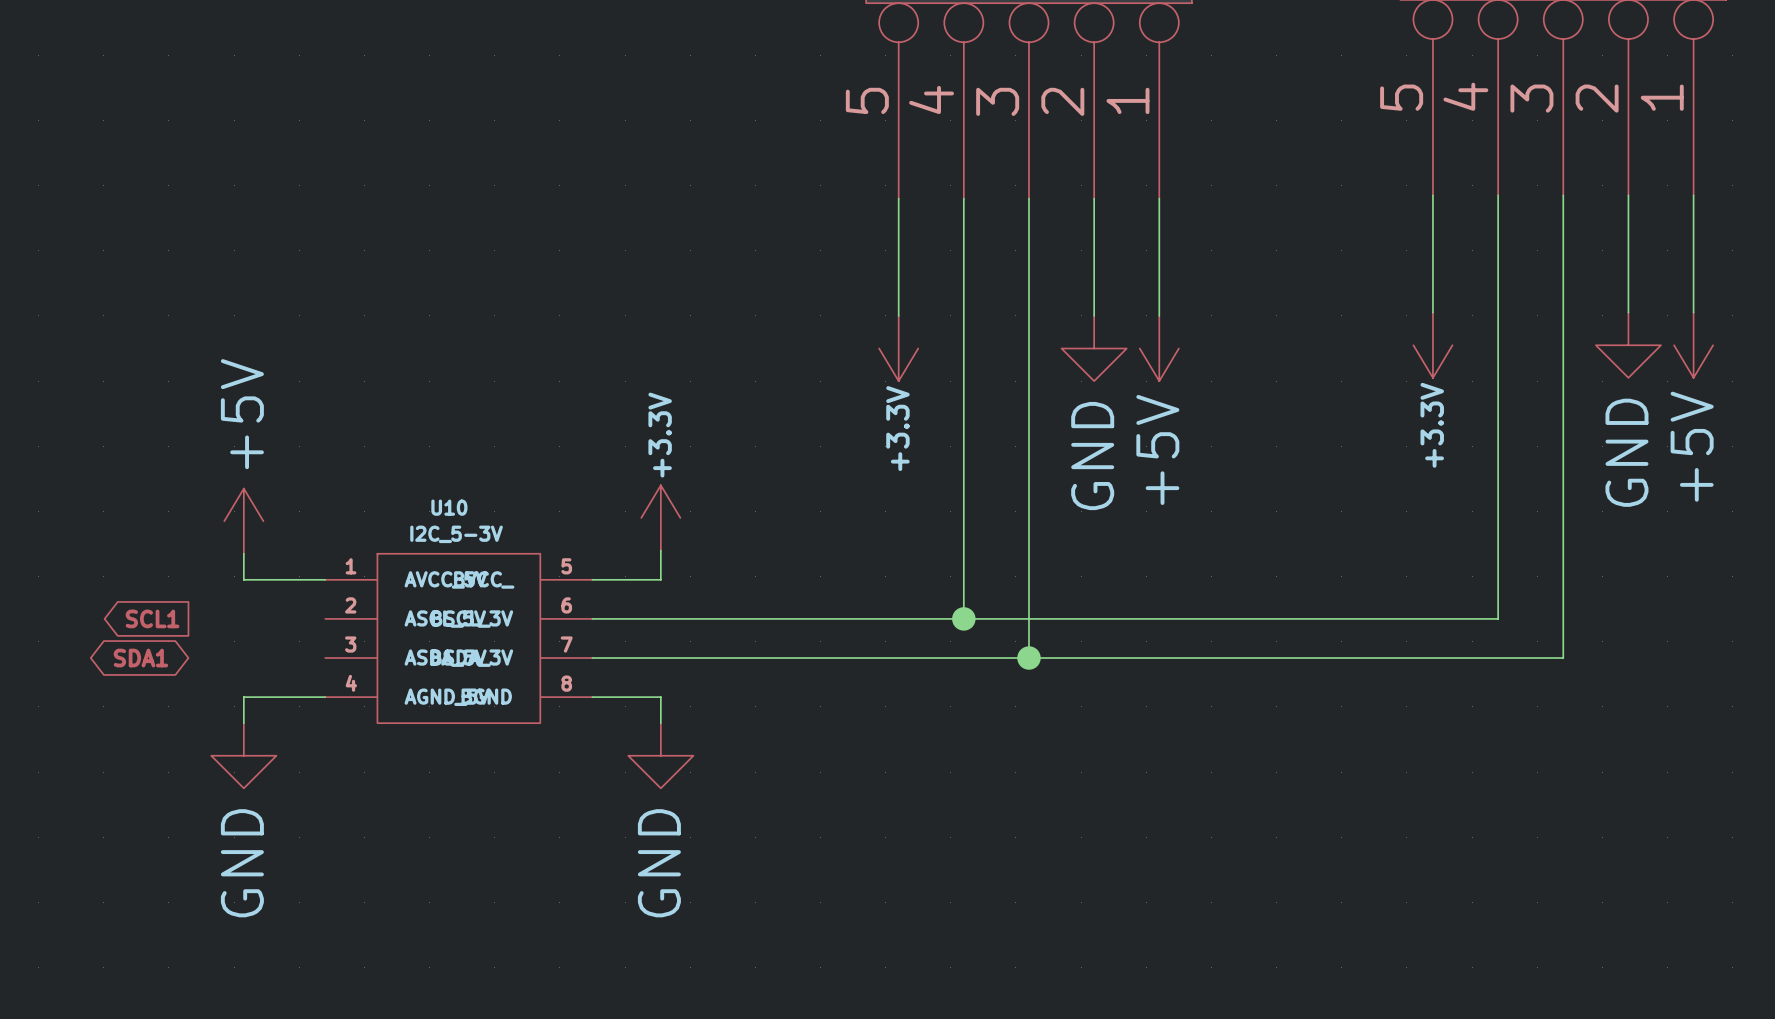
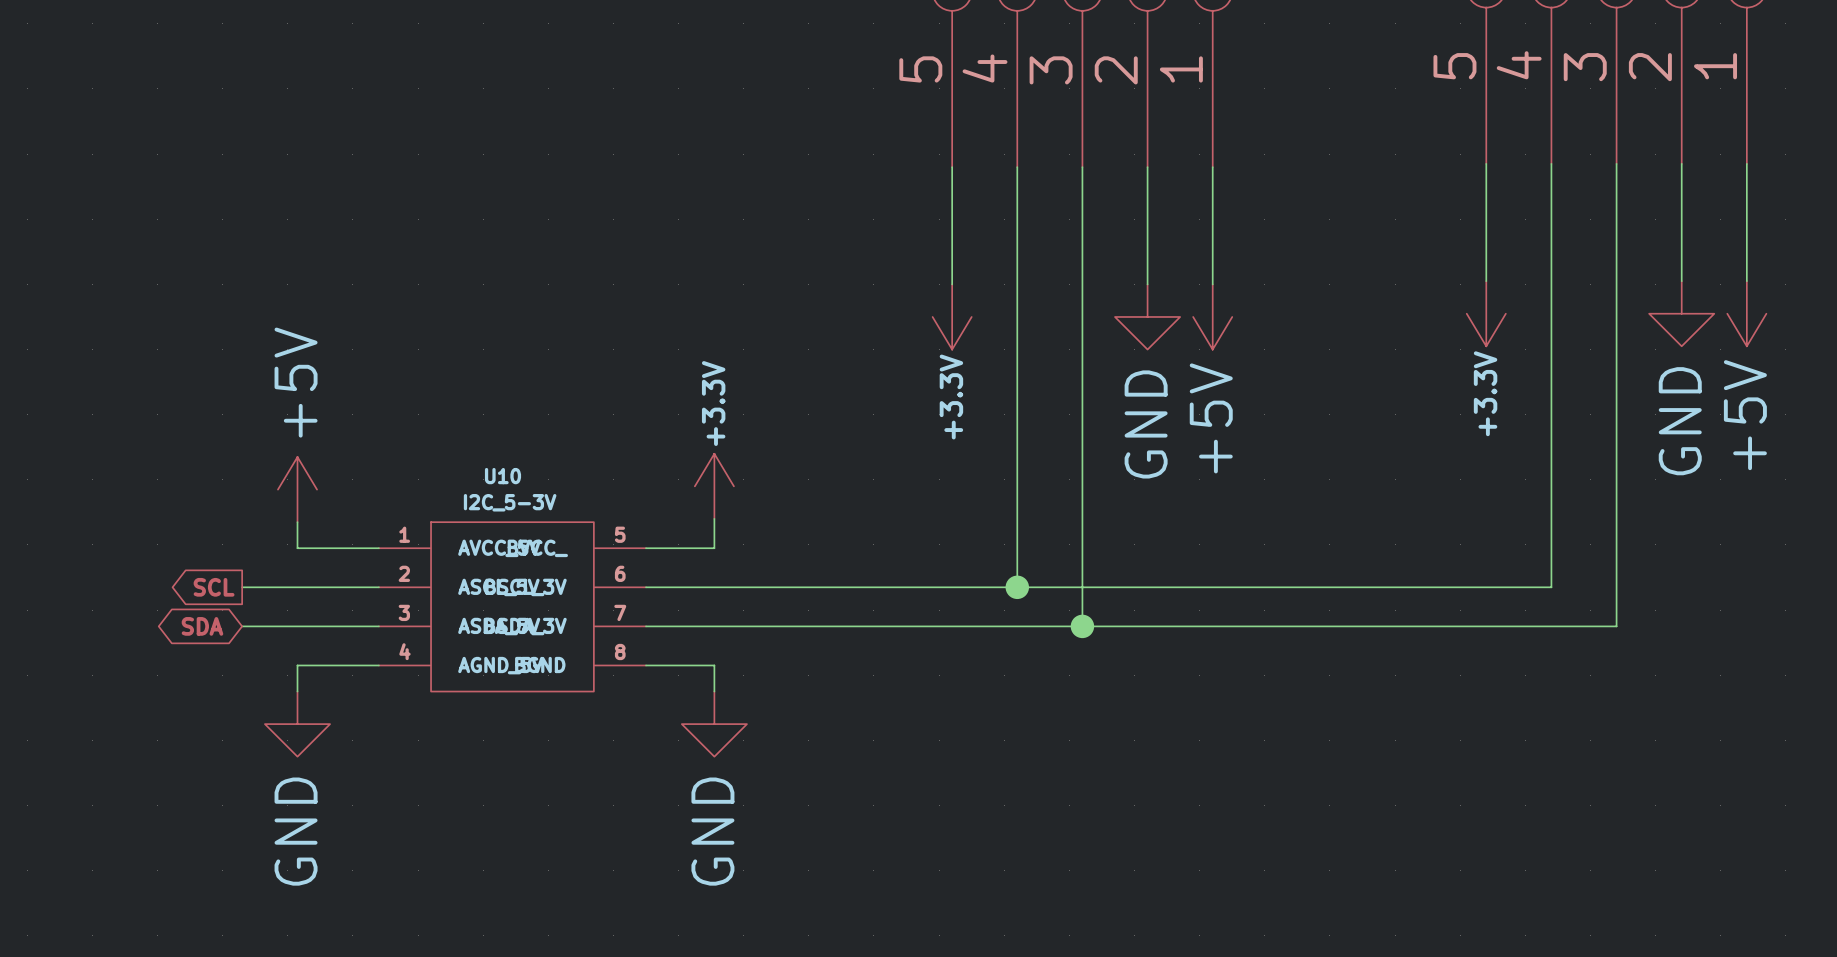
global label: SCL1 (152, 618) -> SCL (214, 587)
wire: none -> (242, 587) (378, 587)
global label: SDA1 (140, 658) -> SDA (202, 626)
wire: none -> (242, 626) (378, 626)

